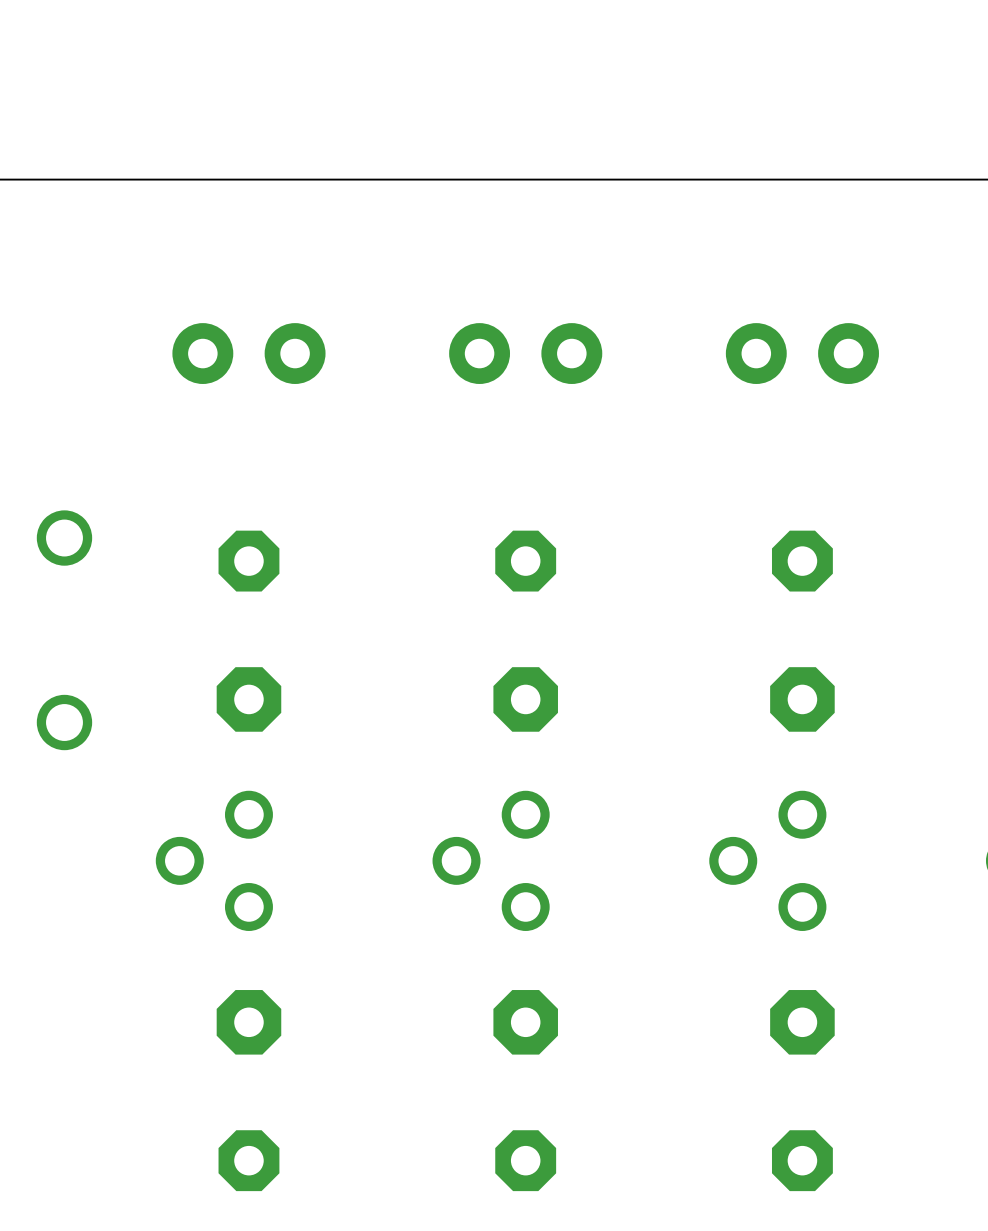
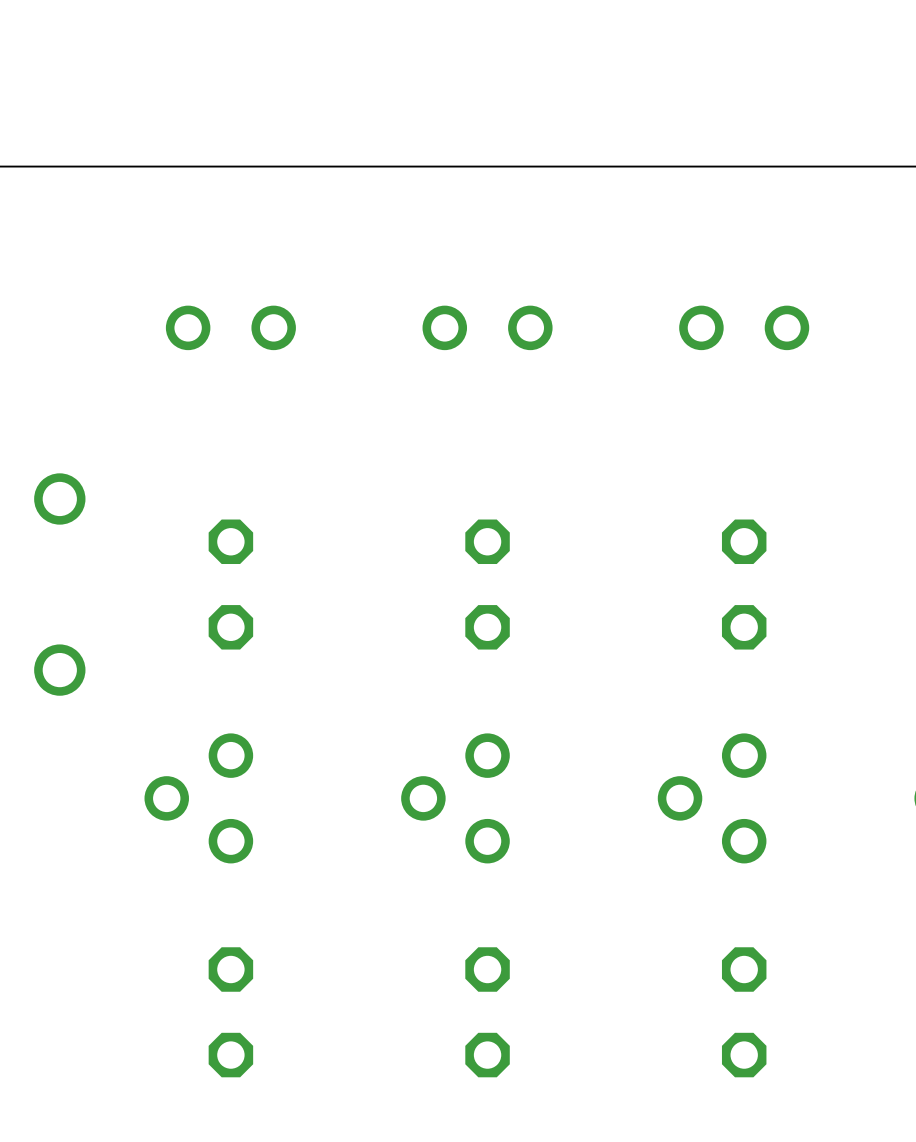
part footprint: [172, 323, 326, 384] -> [165, 305, 296, 351]
part footprint: [449, 323, 603, 384] -> [422, 305, 553, 351]
part footprint: [725, 323, 879, 384] -> [679, 305, 810, 351]
part footprint: [216, 530, 282, 732] -> [208, 519, 254, 650]
part footprint: [493, 530, 558, 732] -> [465, 519, 510, 650]
part footprint: [770, 530, 835, 732] -> [721, 519, 767, 650]
part footprint: [216, 990, 282, 1192] -> [208, 947, 254, 1078]
part footprint: [493, 990, 558, 1192] -> [465, 947, 510, 1078]
part footprint: [770, 990, 835, 1192] -> [721, 947, 767, 1078]

